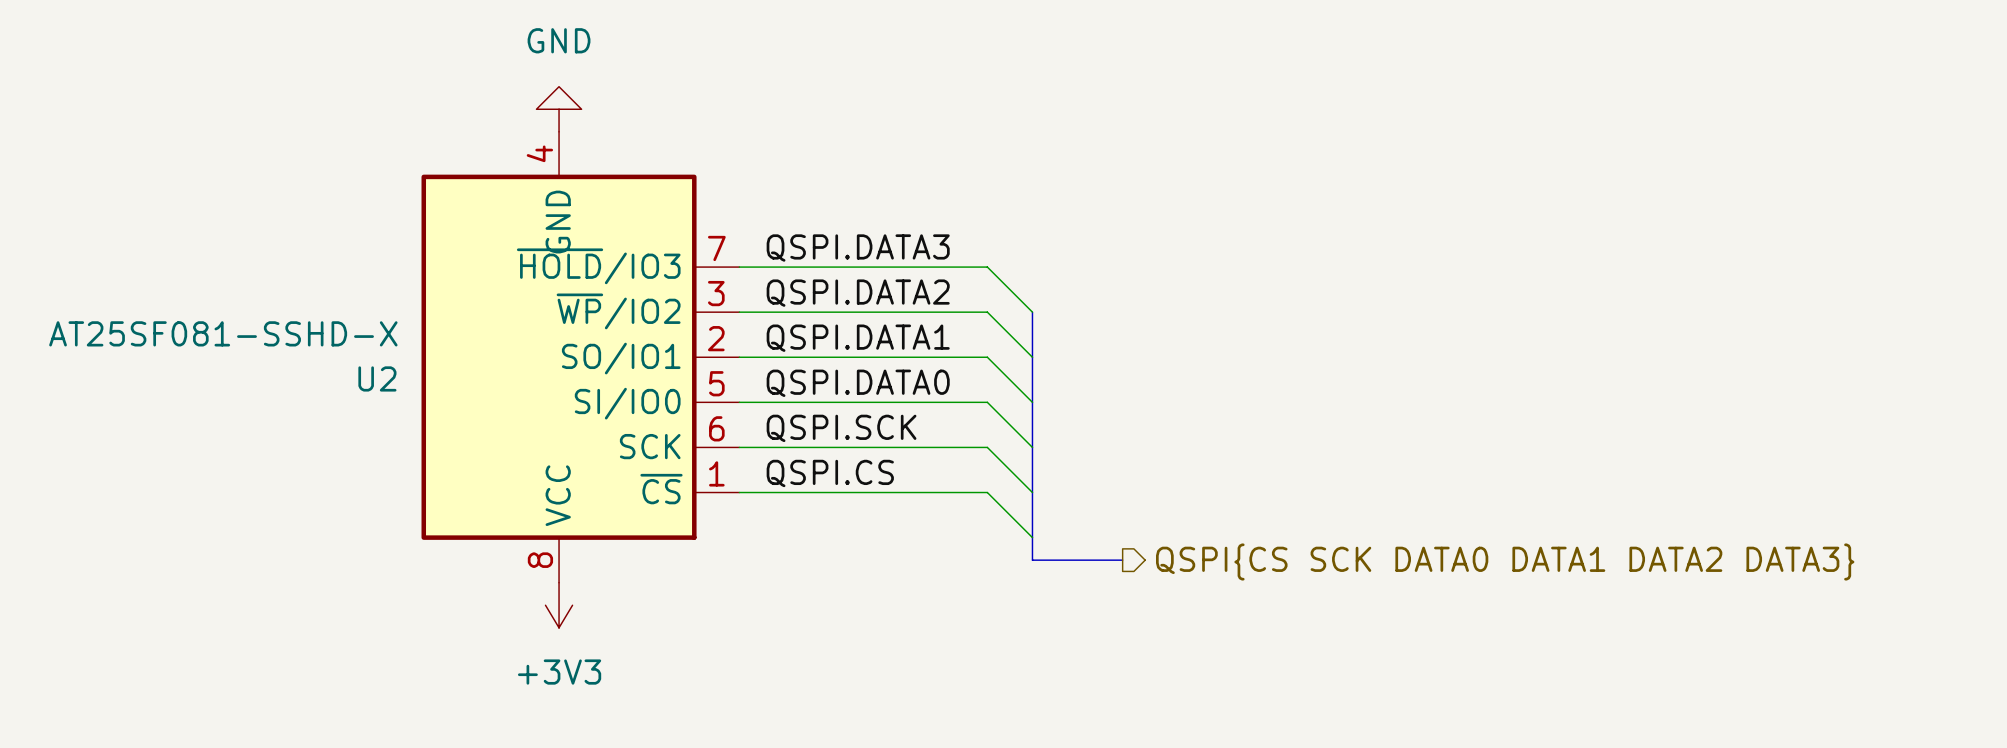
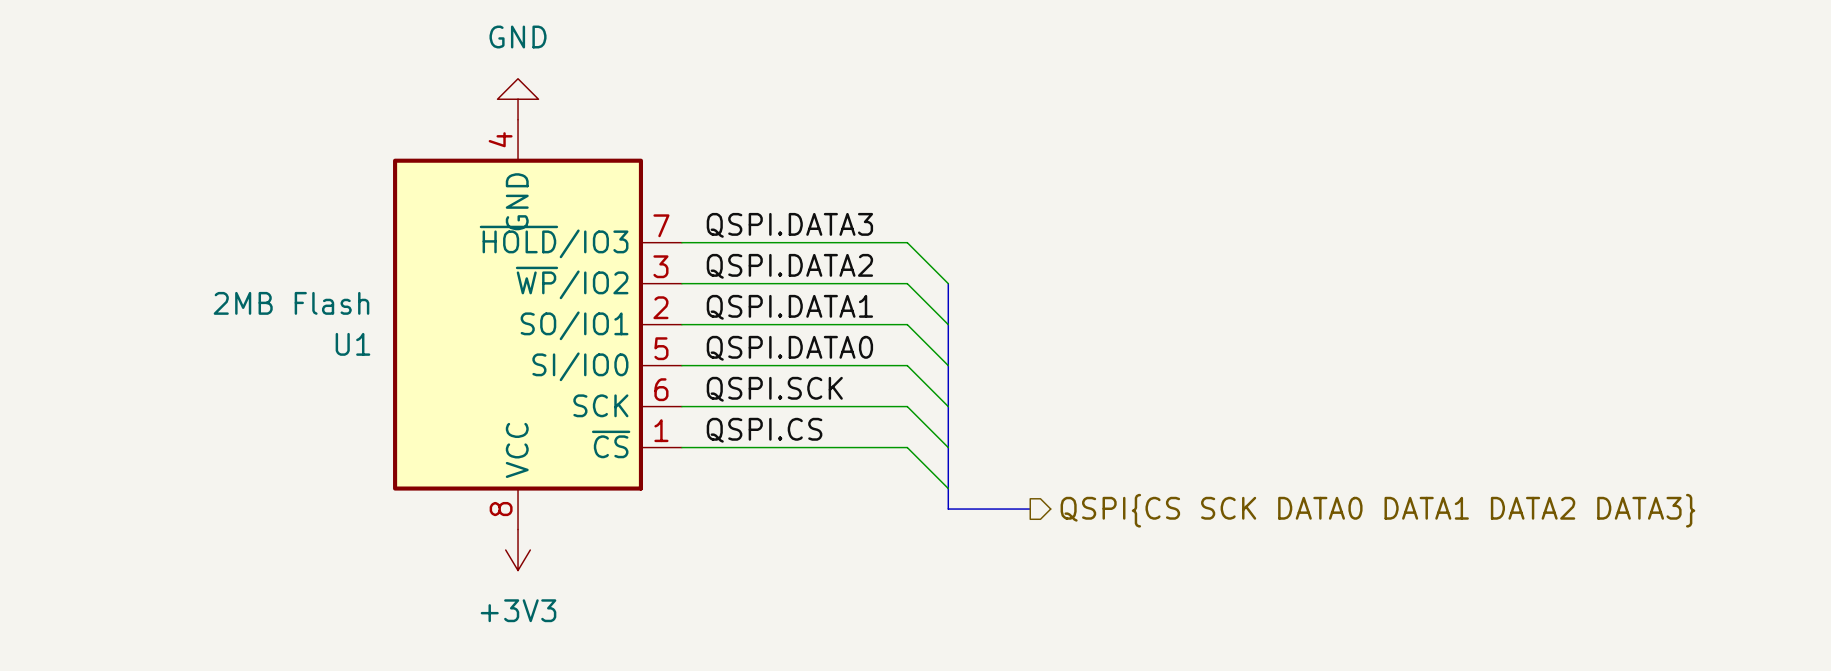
U2 value: AT25SF081-SSHD-X (223, 333) -> 2MB Flash (291, 303)
U2 name: U2 (377, 378) -> U1 (352, 344)

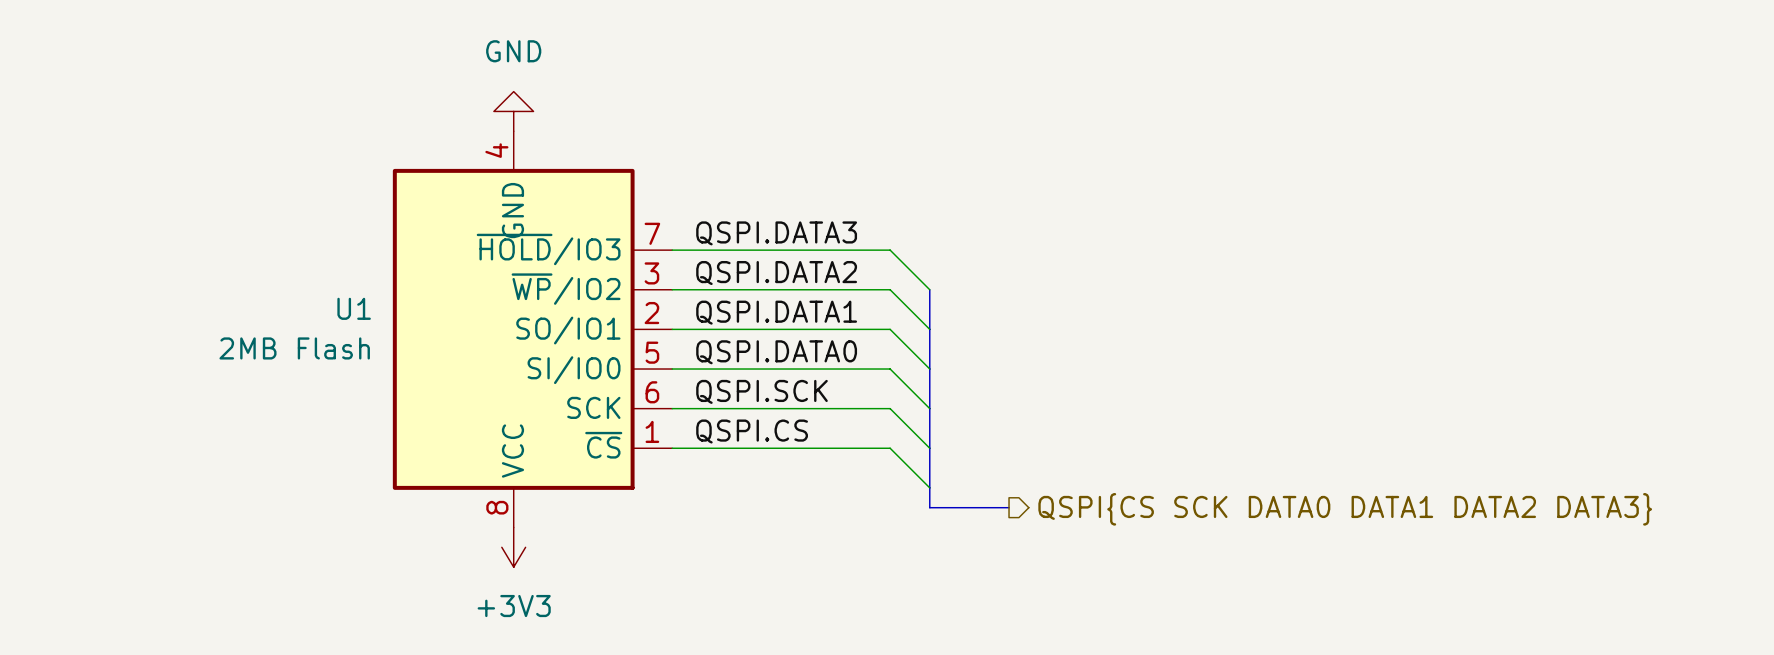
U1 value position: 2MB Flash (291, 303) -> 2MB Flash (294, 348)
U1 name position: U1 (352, 344) -> U1 (354, 308)

